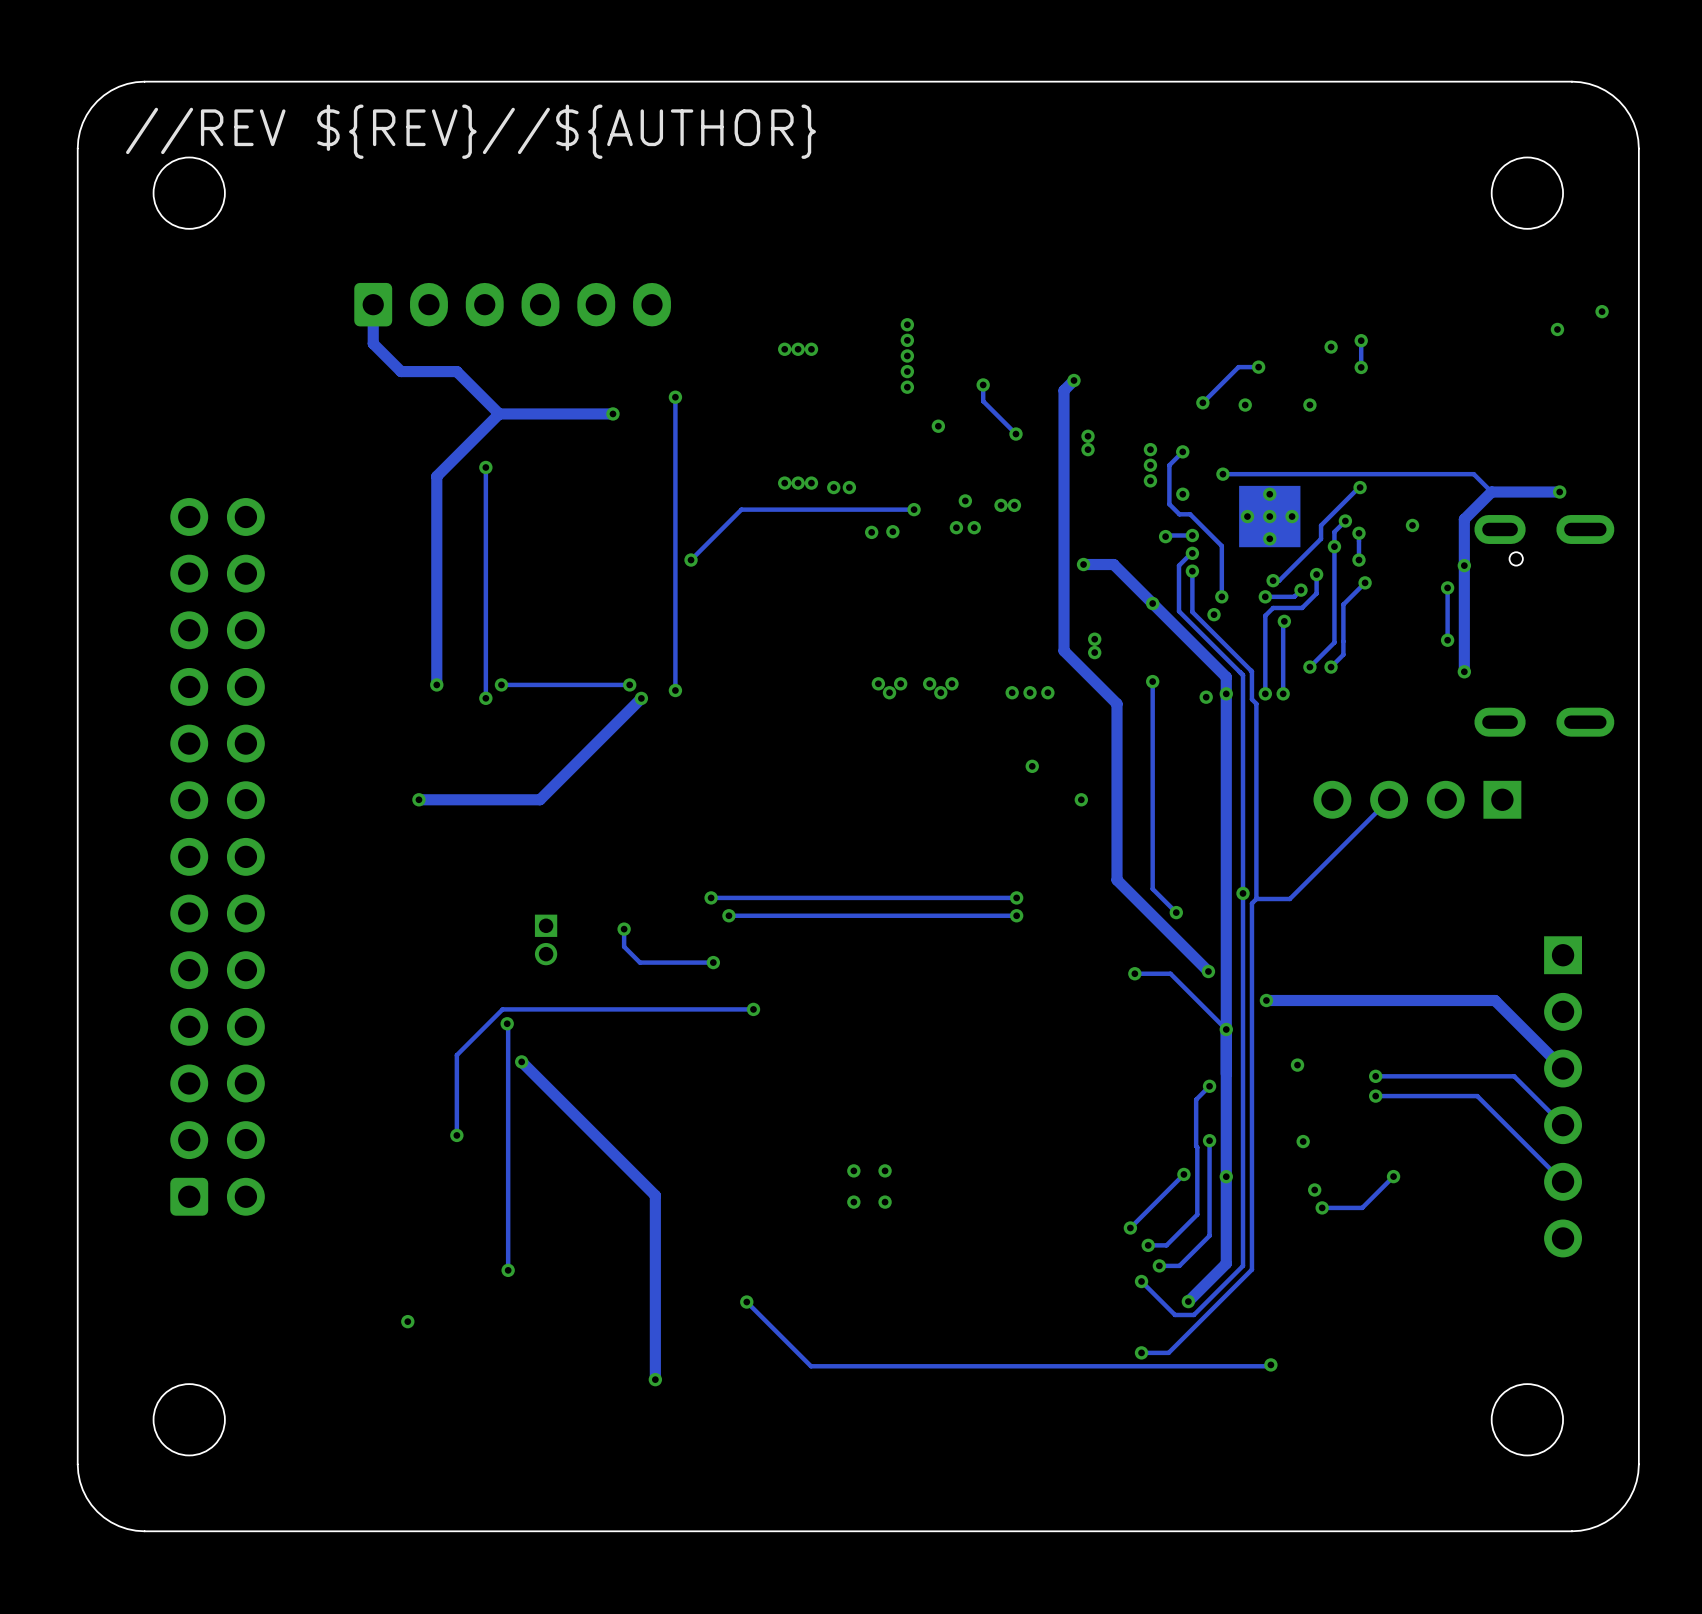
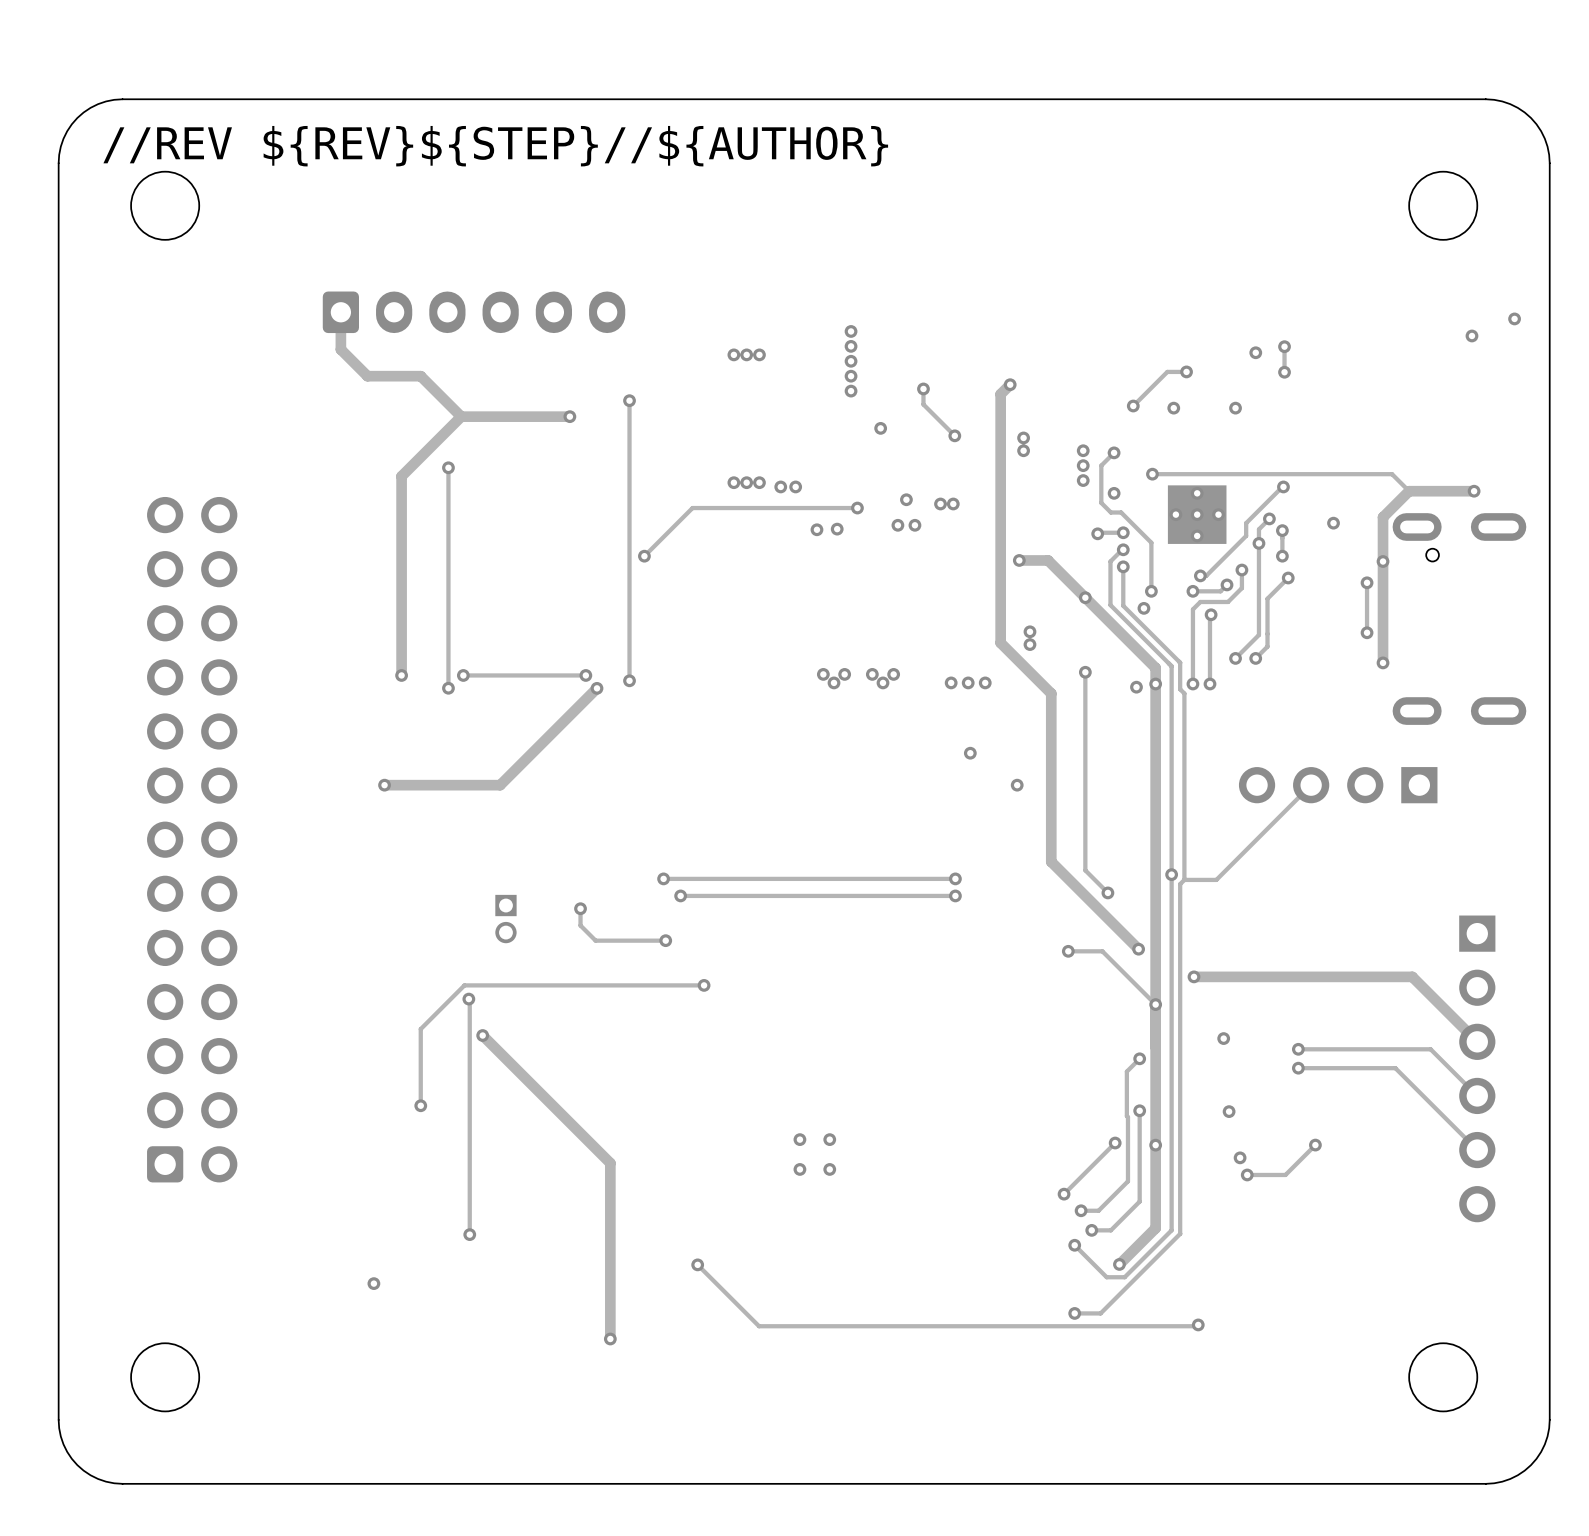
text: //REV ${REV}//${AUTHOR} (471, 131) -> //REV ${REV}${STEP}//${AUTHOR} (495, 146)

